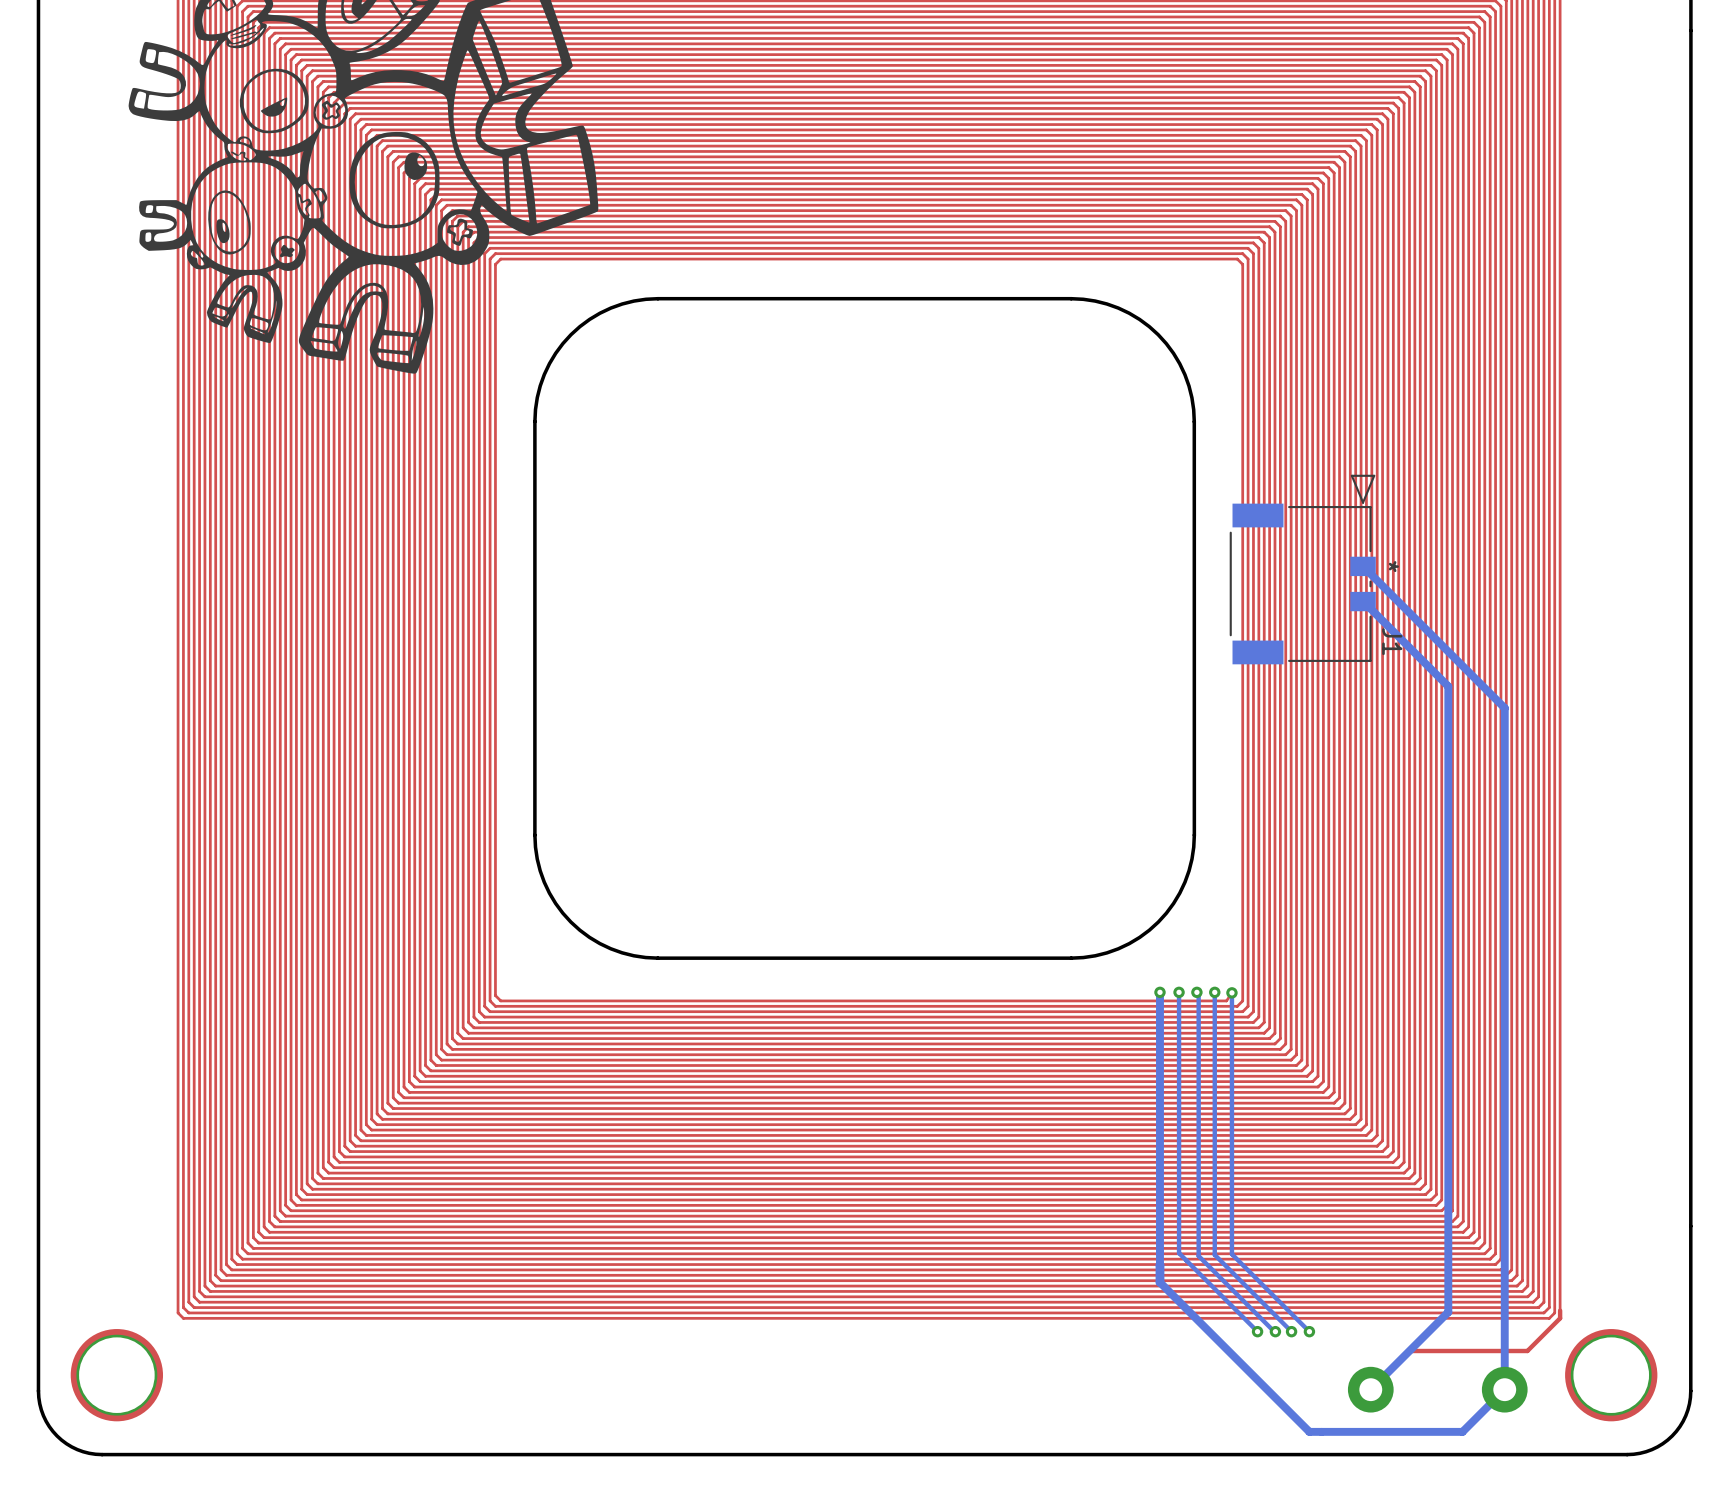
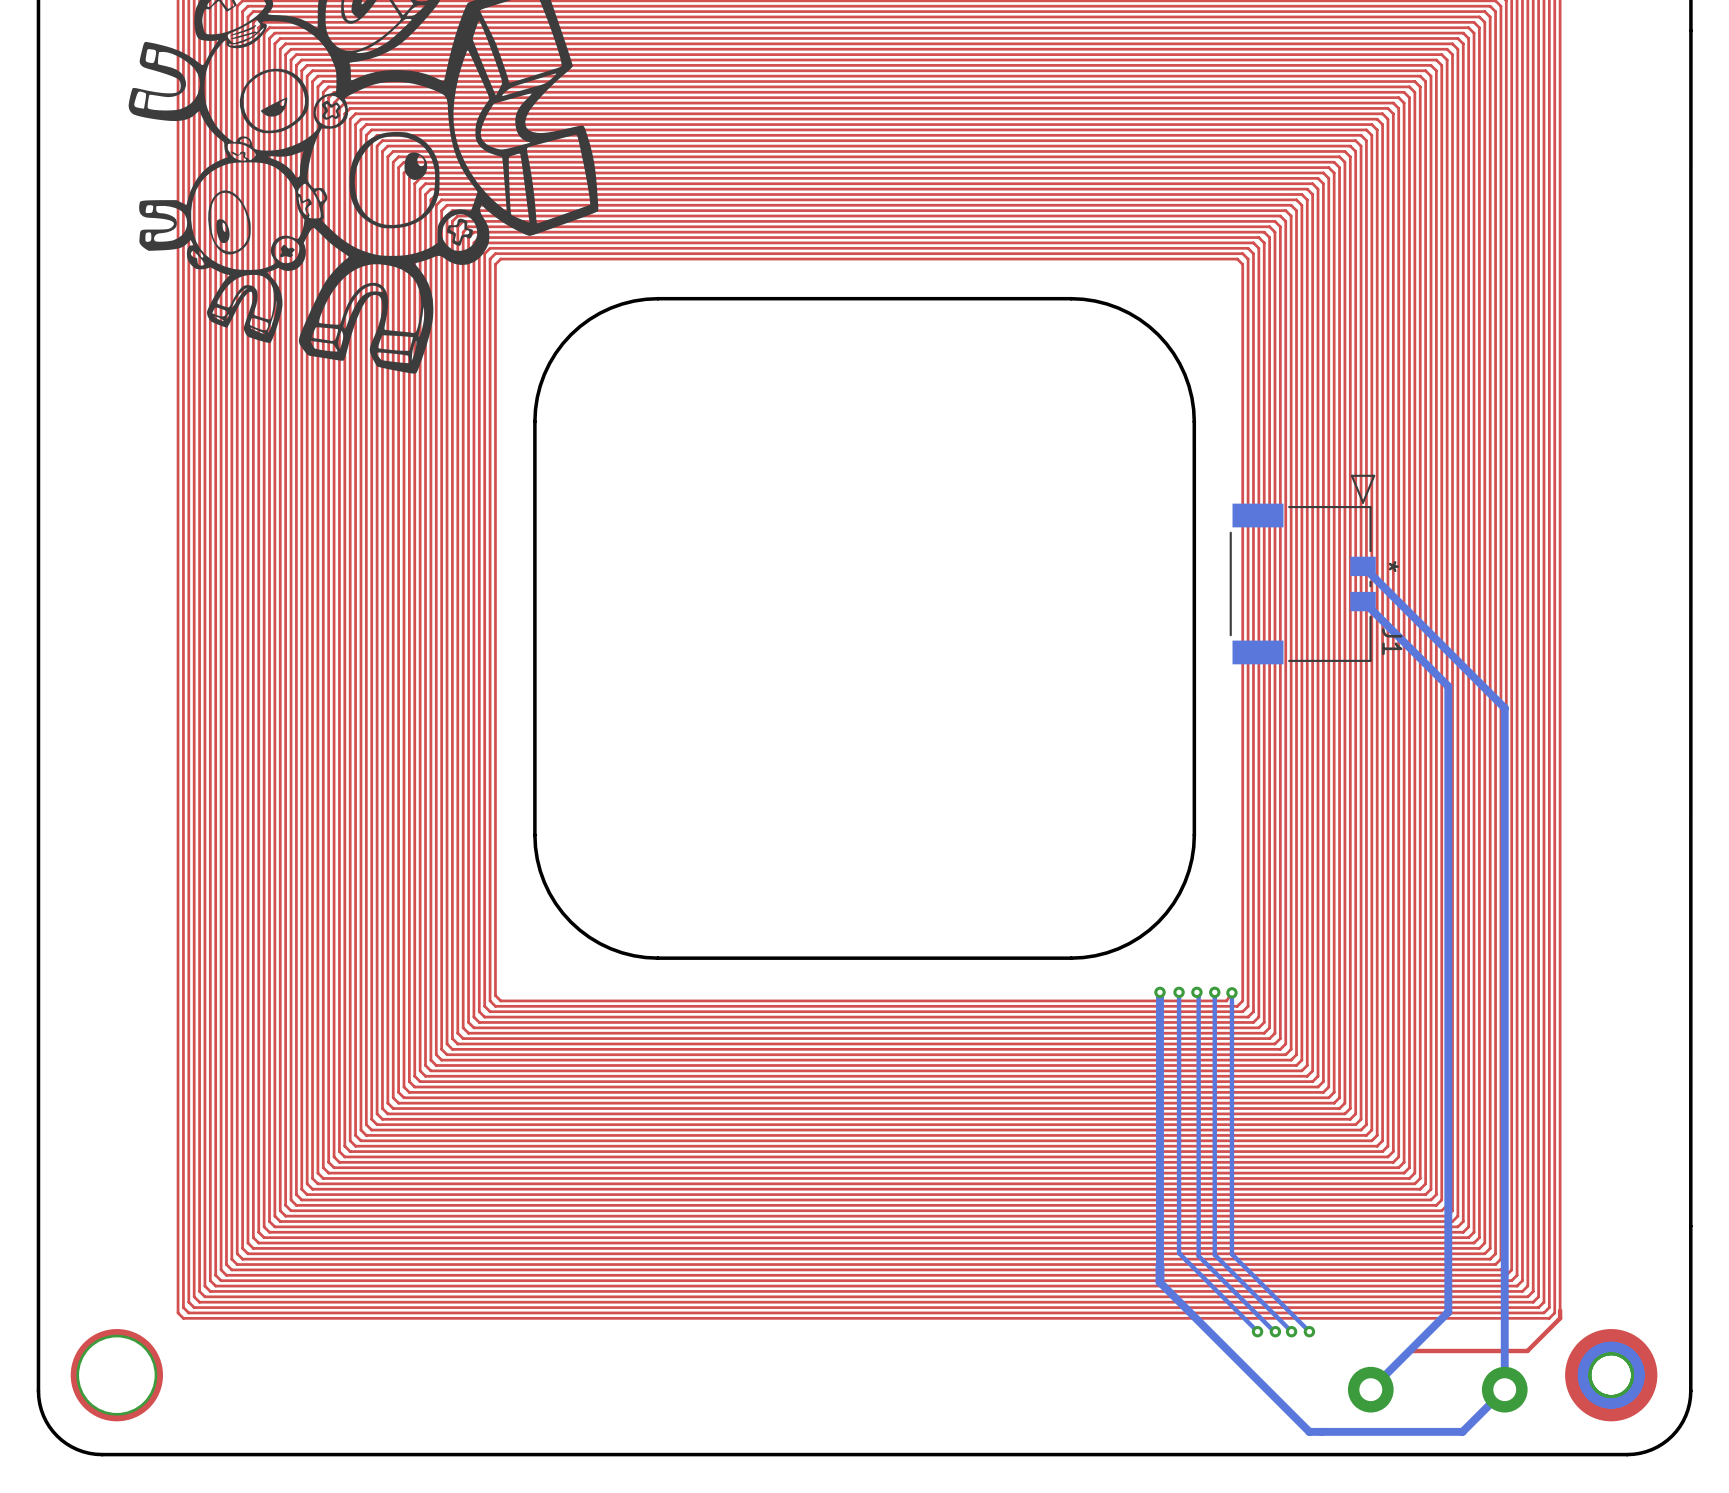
part footprint: [1570, 1334, 1652, 1416] -> [1577, 1341, 1645, 1409]

